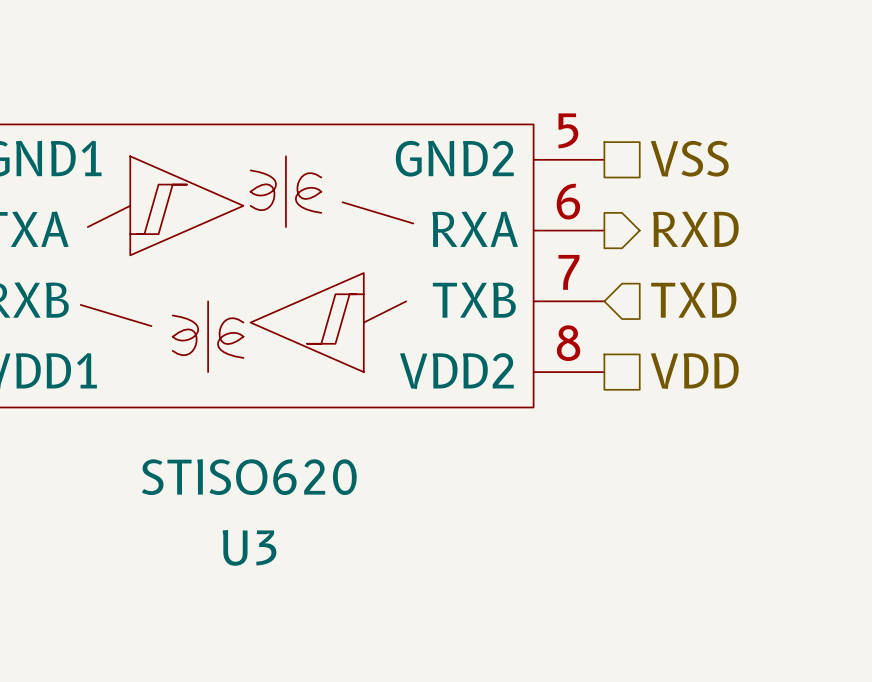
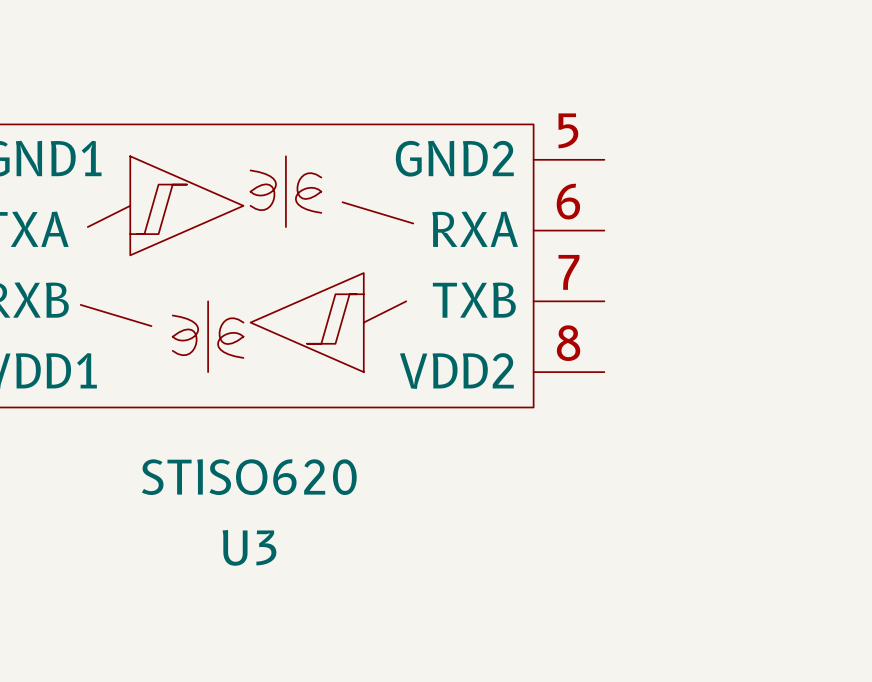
hierarchical label: VSS (689, 158) -> none
hierarchical label: RXD (695, 229) -> none
hierarchical label: TXD (693, 300) -> none
hierarchical label: VDD (694, 371) -> none

